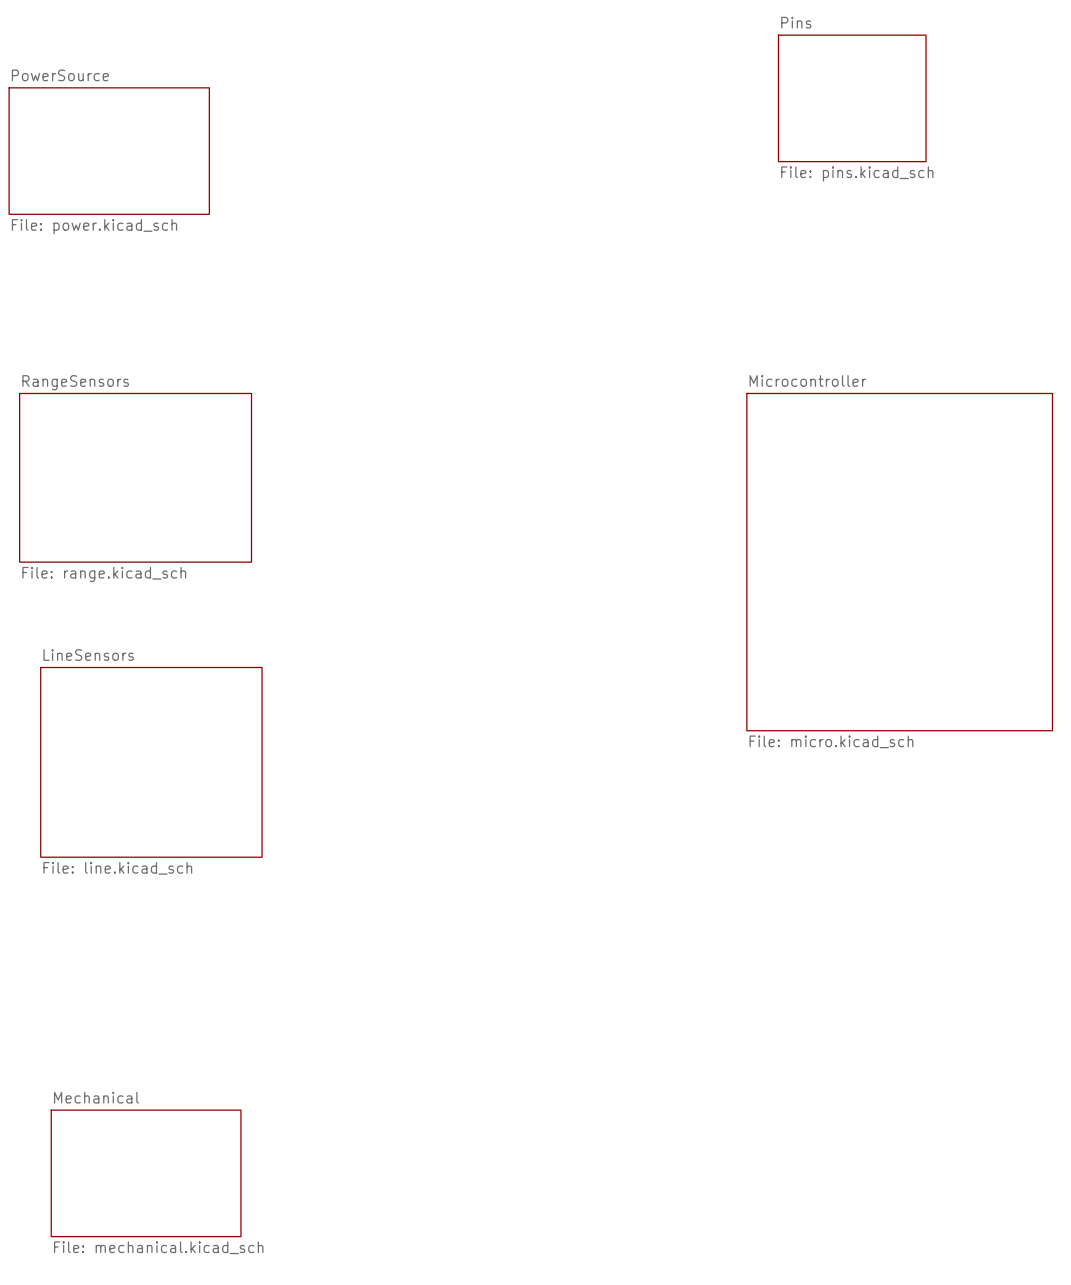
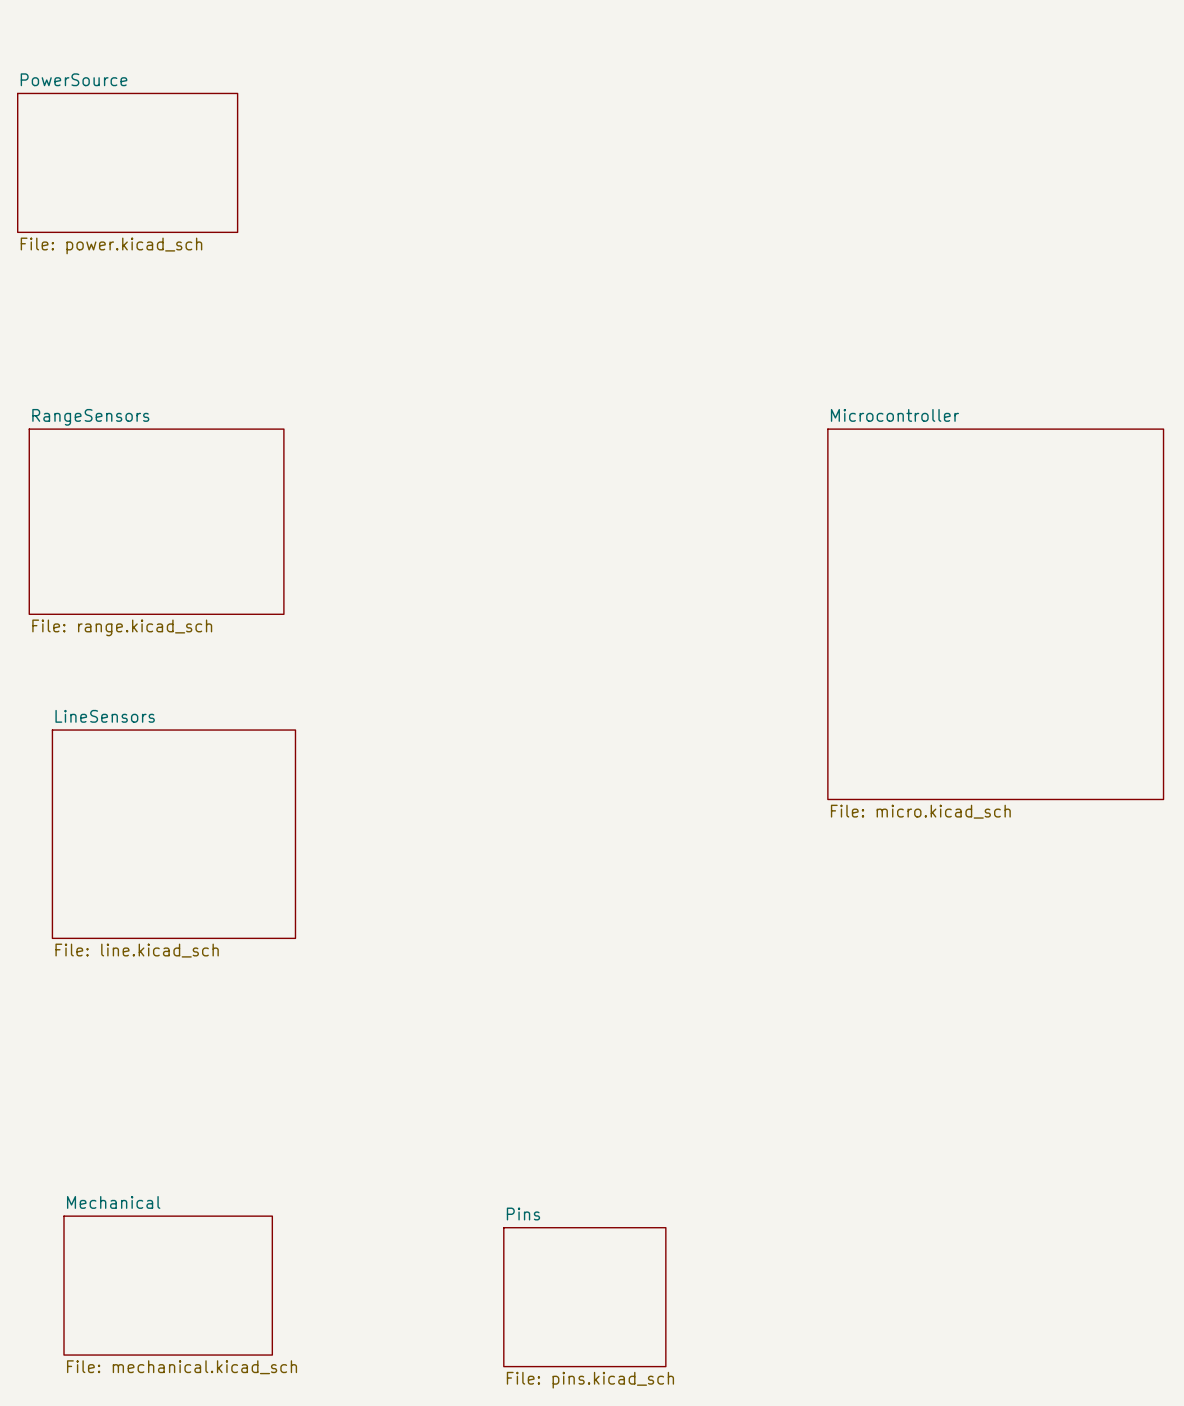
sheet Pins: File: pins.kicad_sch (852, 98) -> none
sheet Pins: none -> File: pins.kicad_sch (584, 1297)

